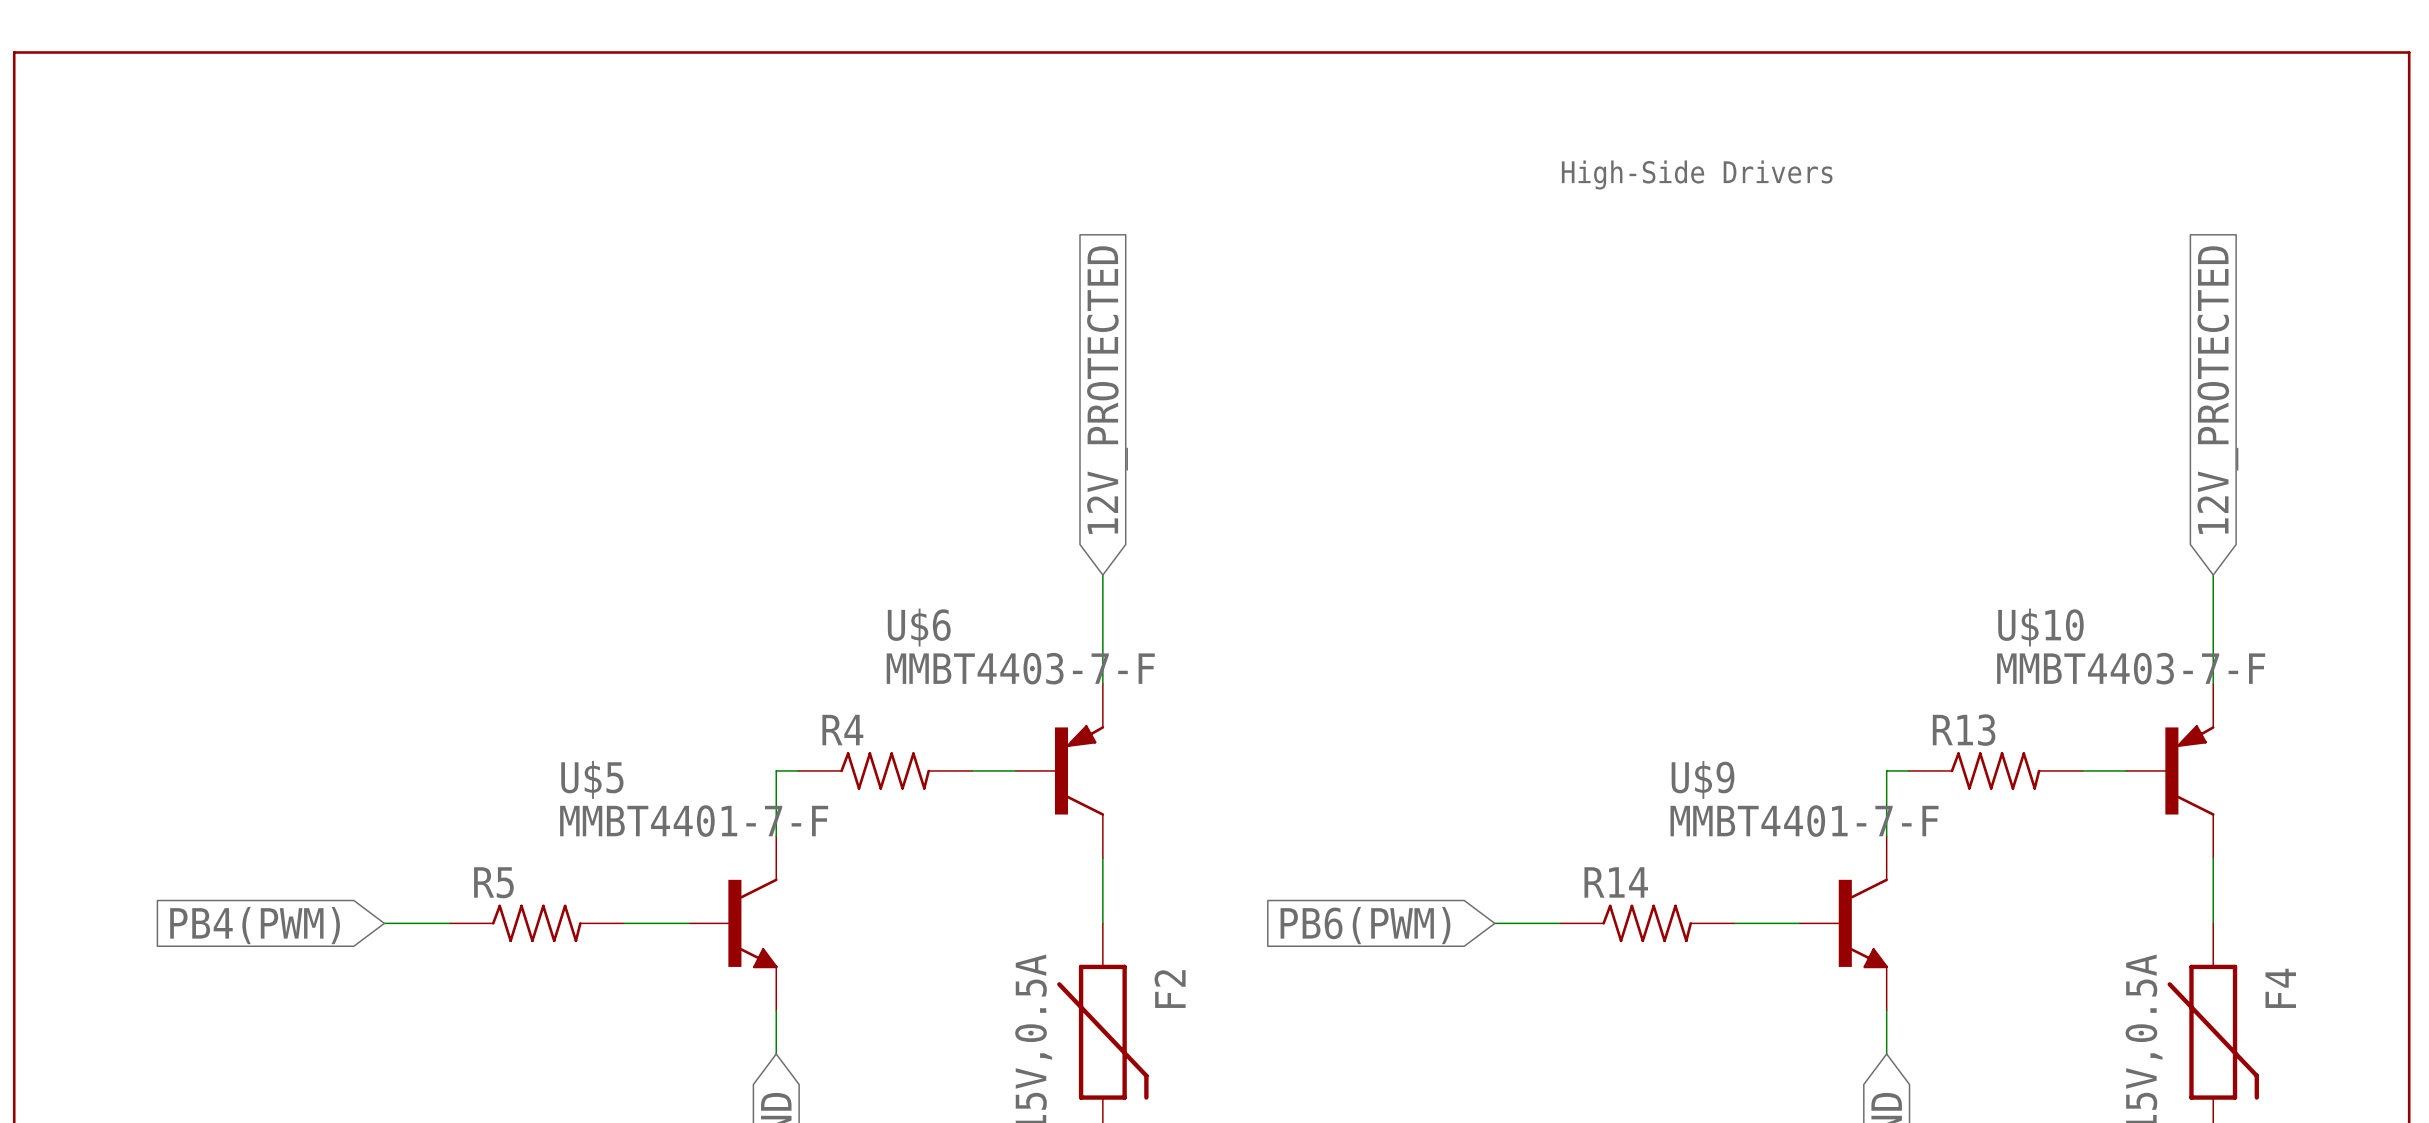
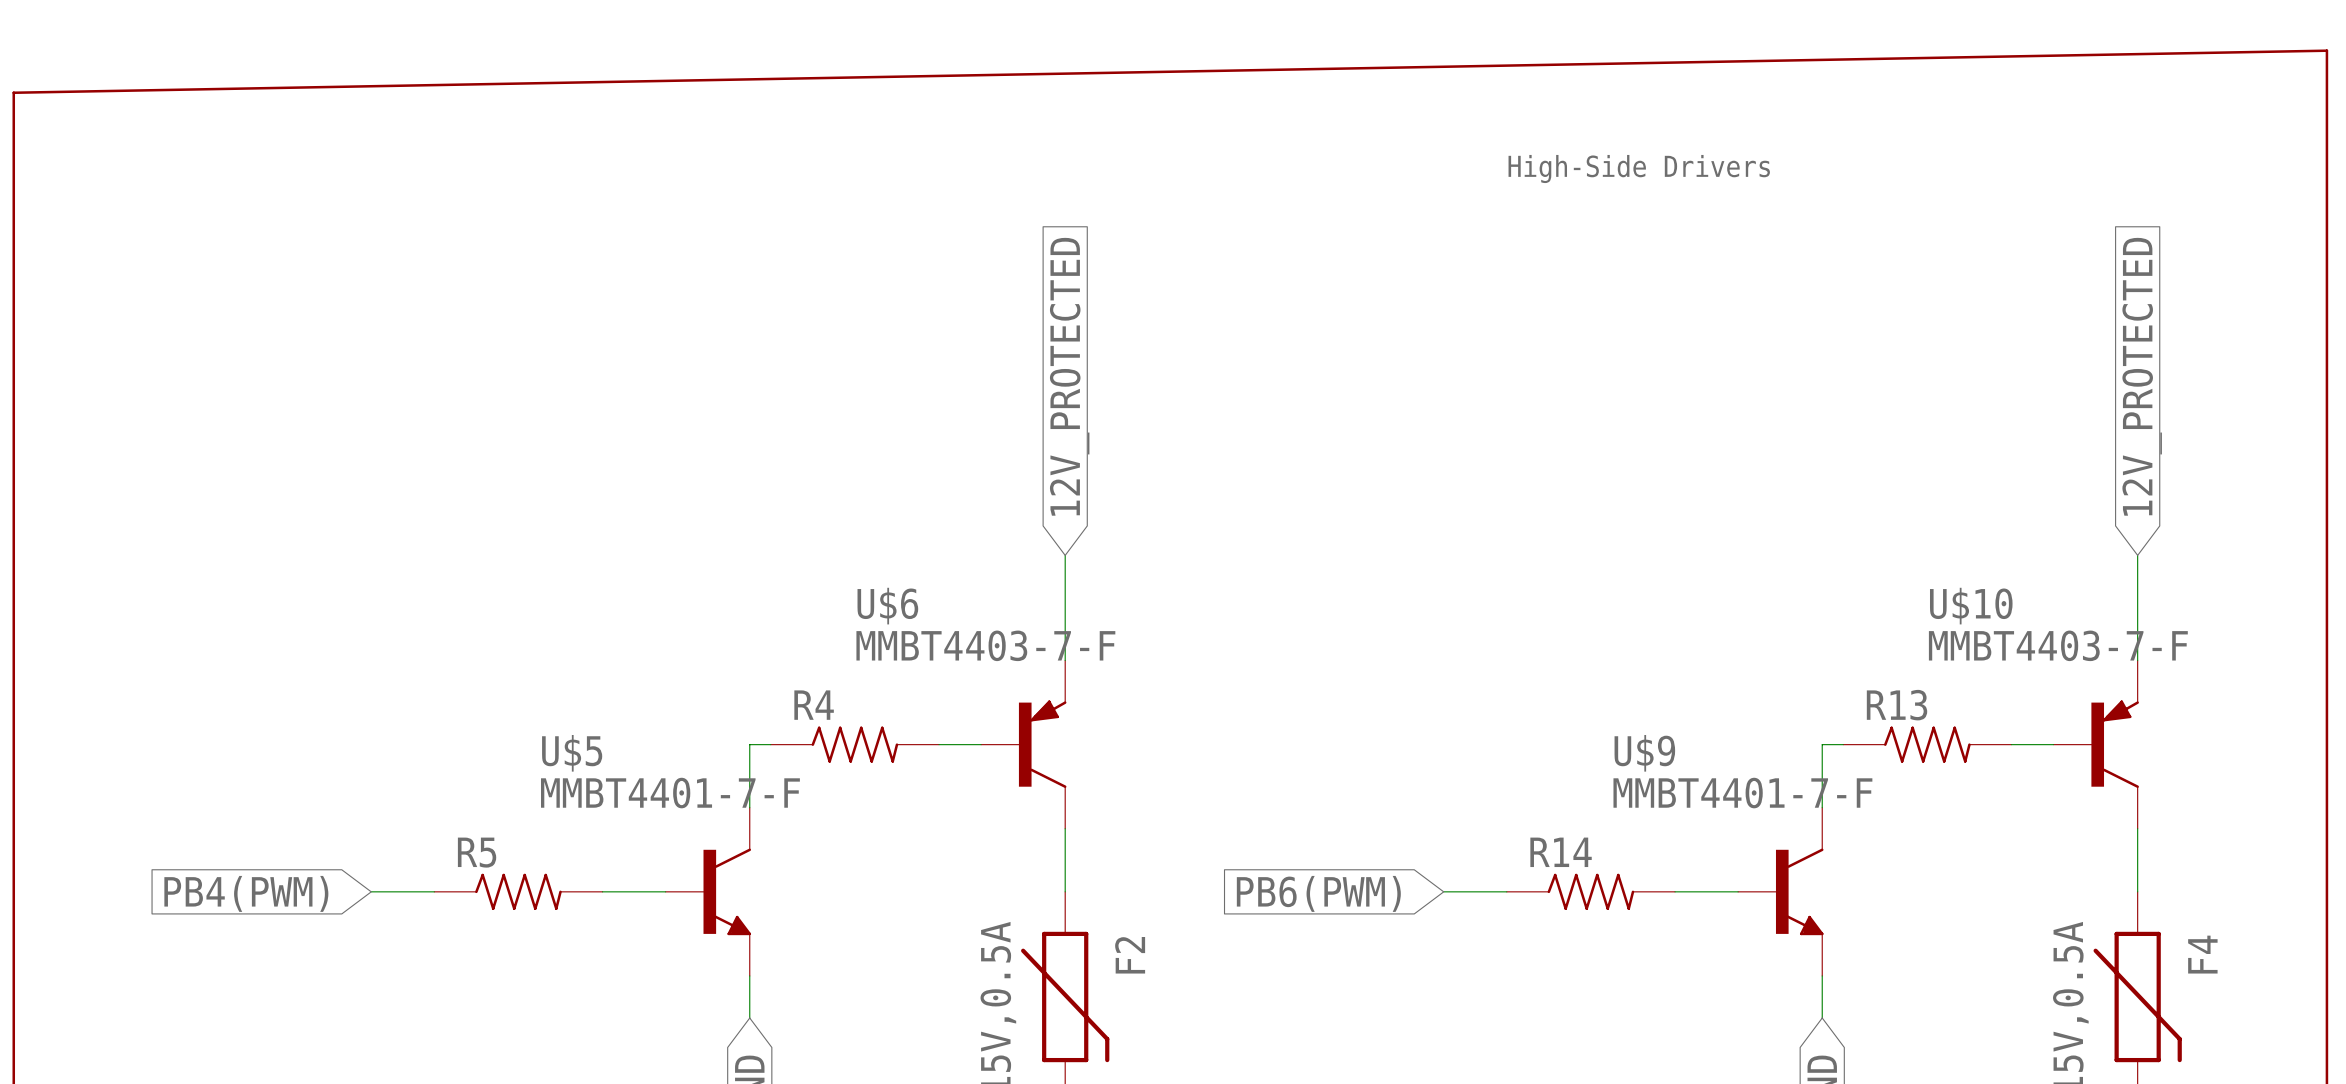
line: (2409, 52) (14, 52) (14, 96) -> (2326, 50) (13, 92)

